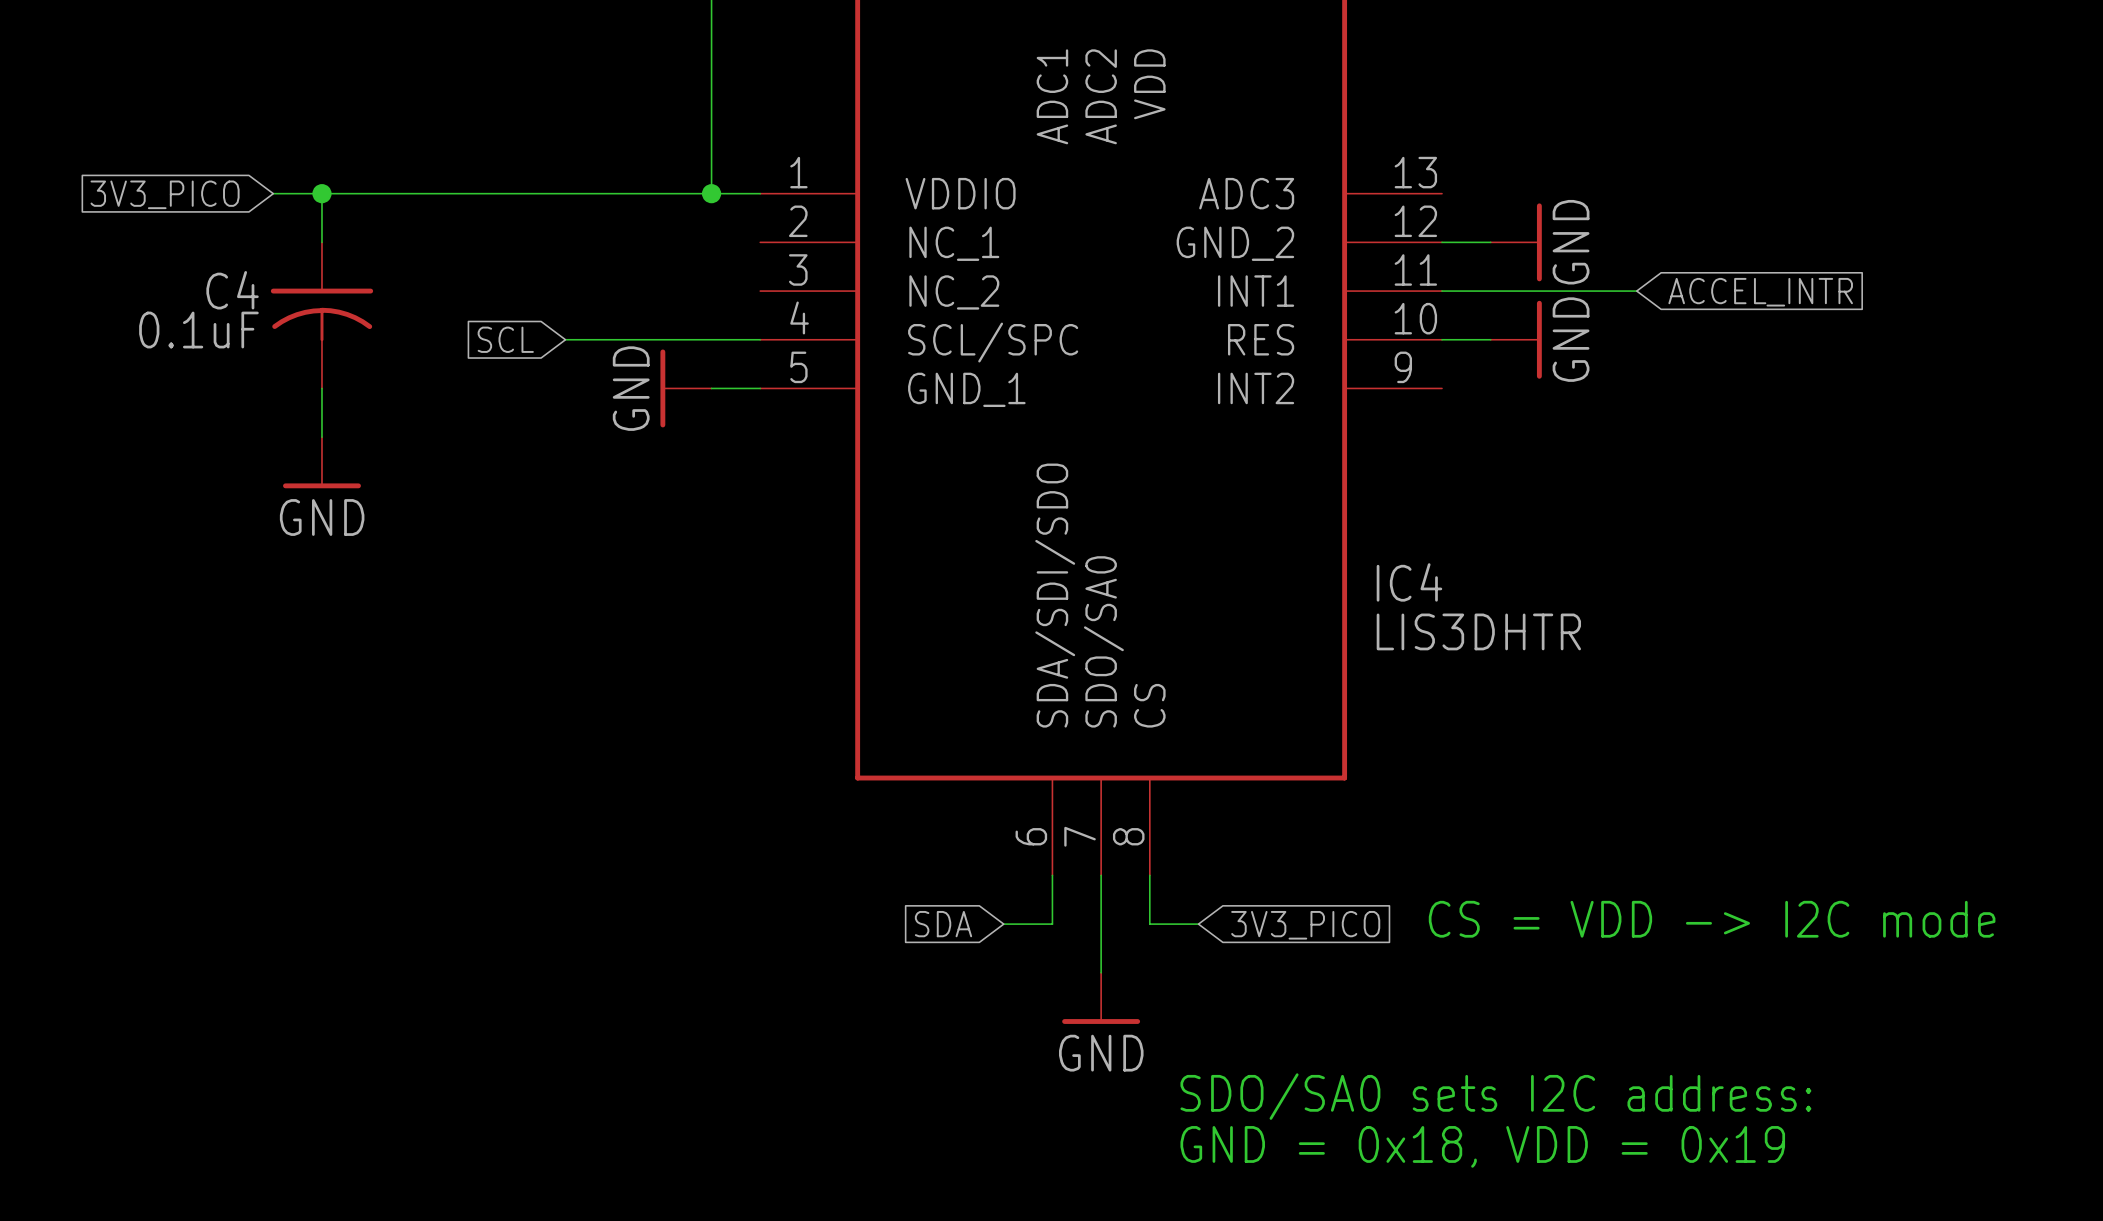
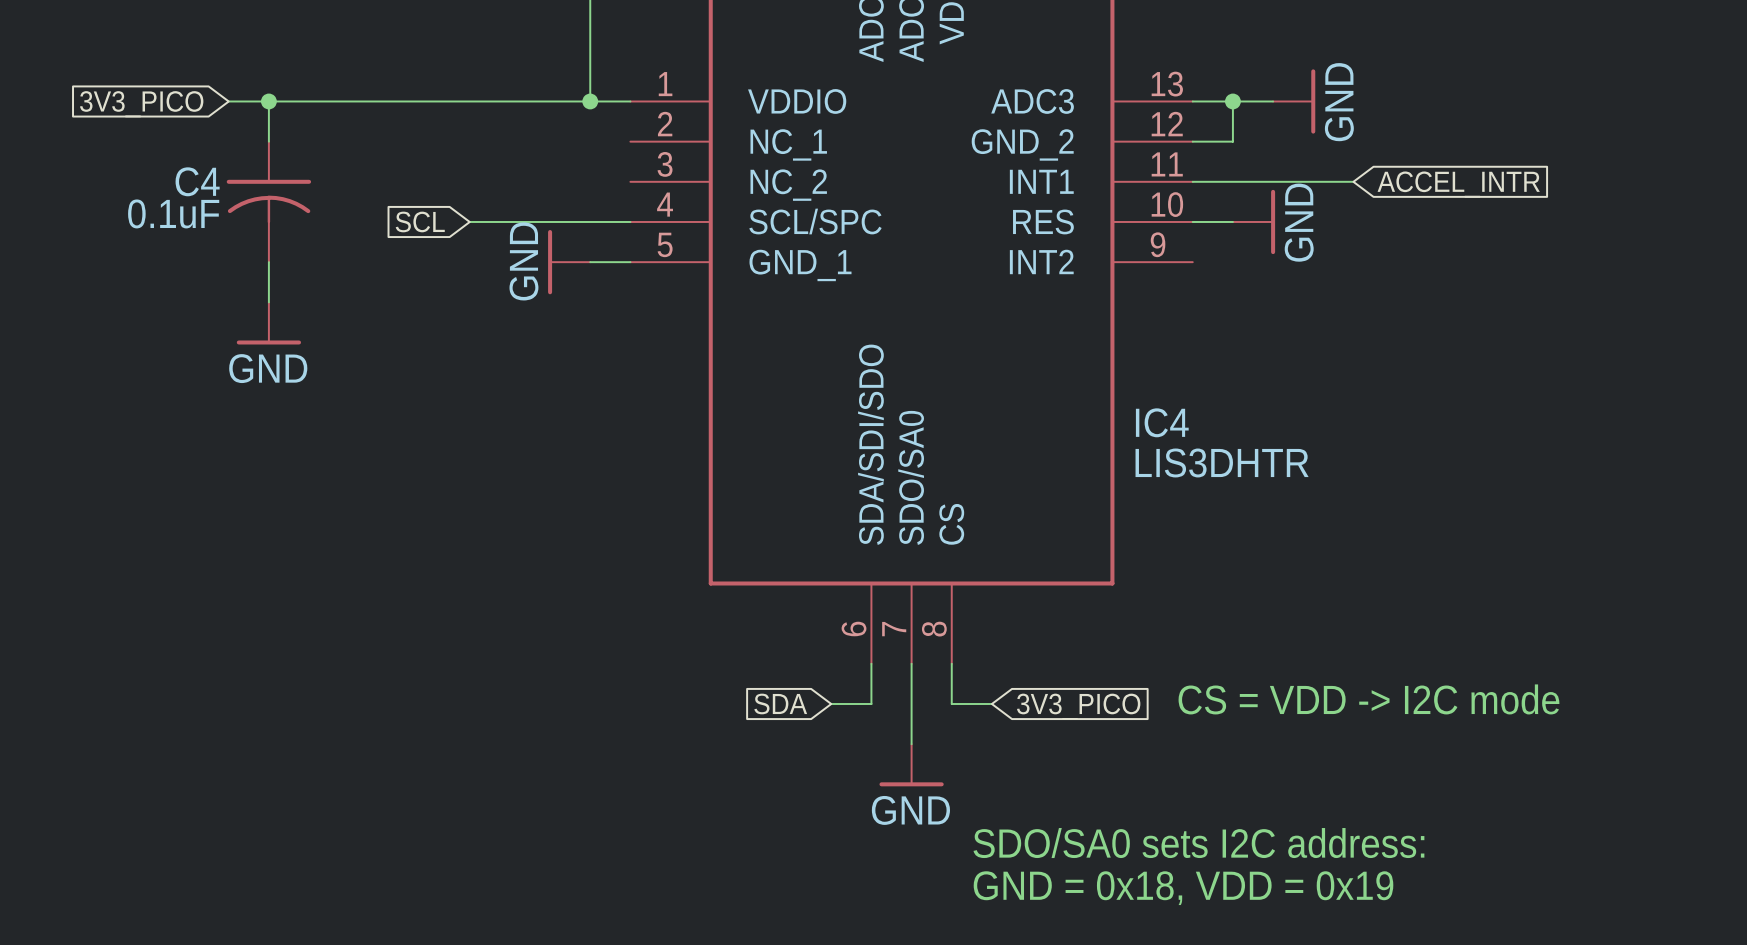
wire: none -> (1192, 101) (1273, 101)
wire: none -> (1232, 101) (1232, 141)
junction: none -> (1232, 101)
power symbol position: GND (1516, 242) -> GND (1294, 101)

